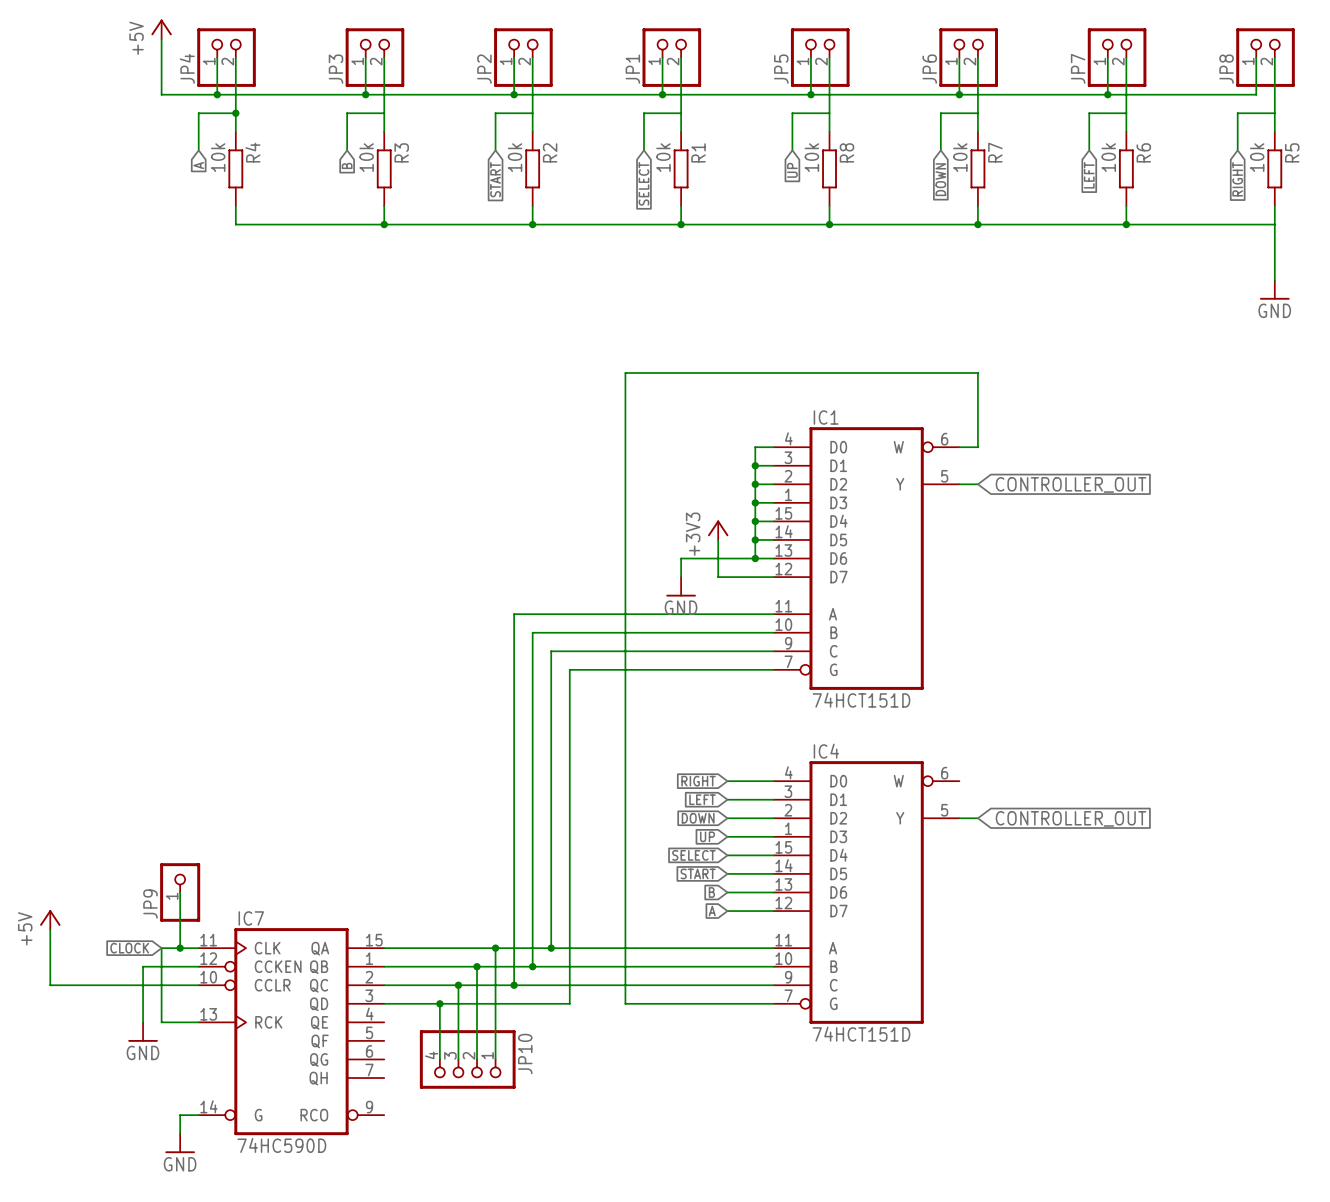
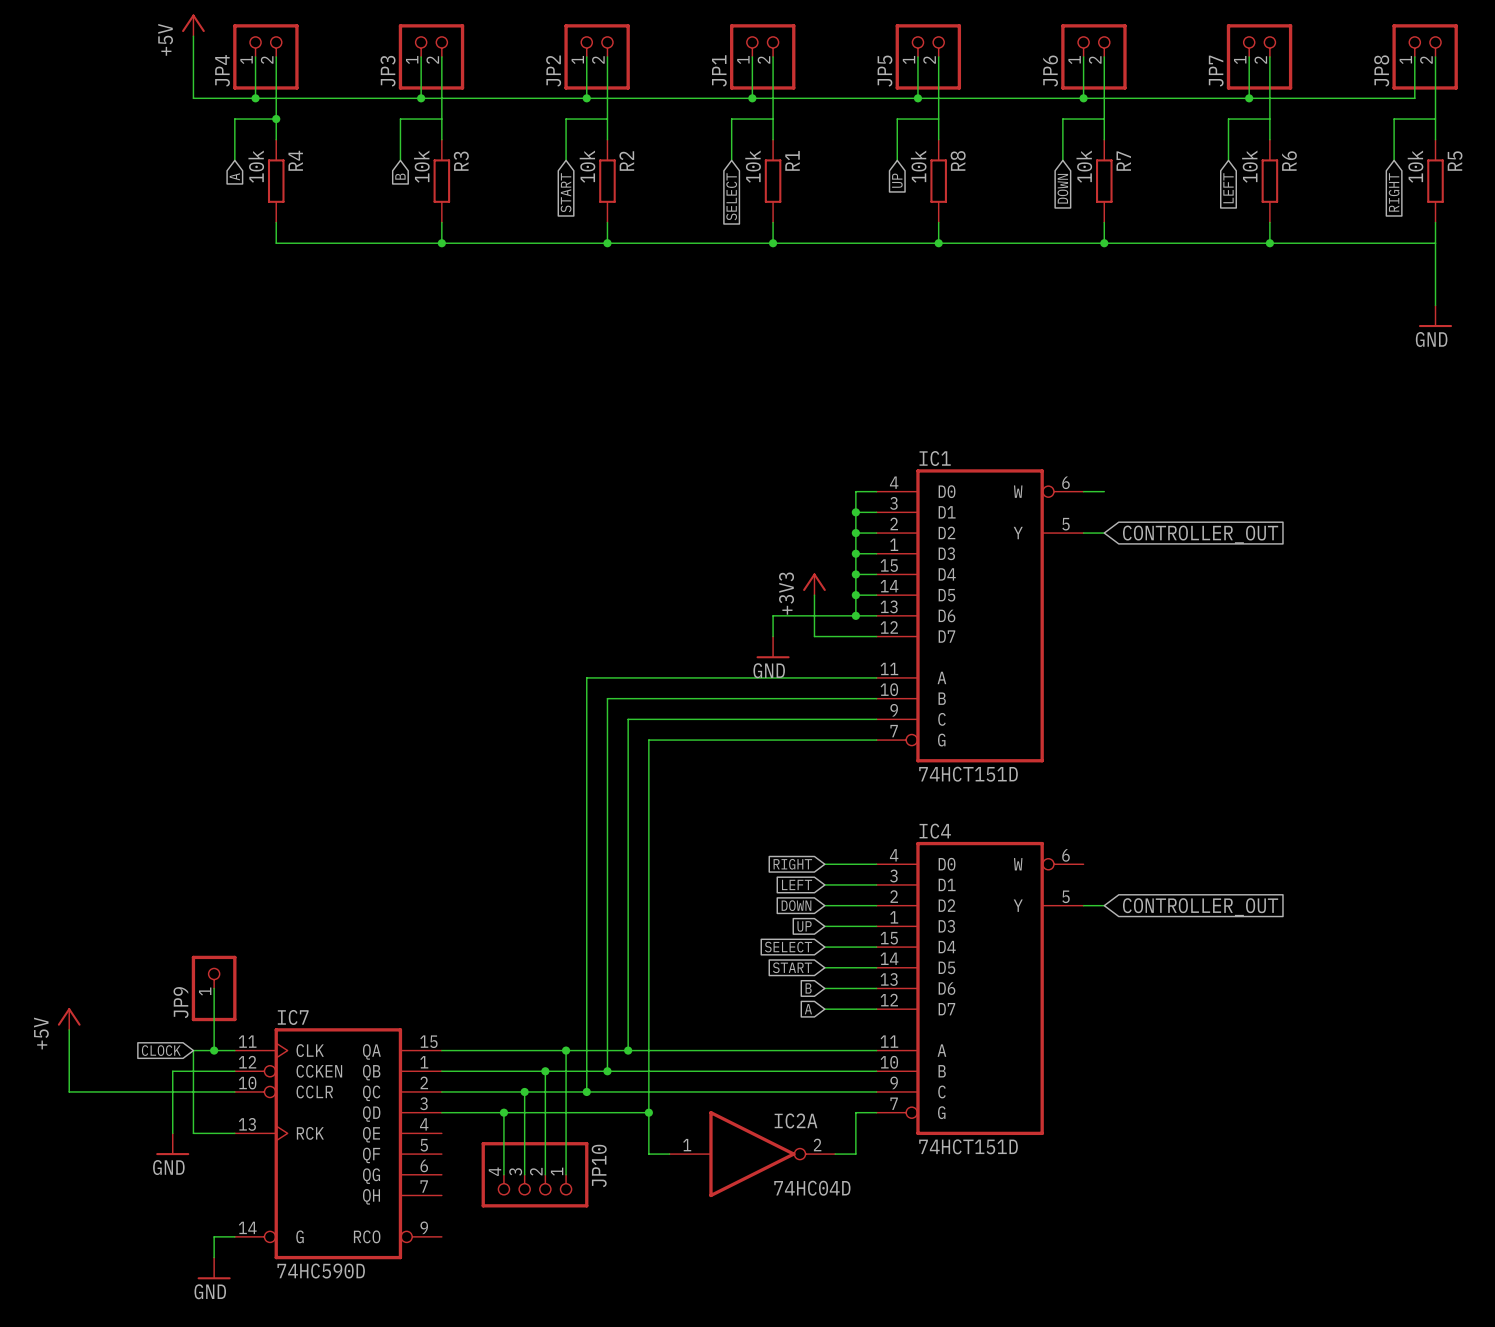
wire: (977, 447) (977, 372) (625, 372) (625, 1003) (755, 1003) -> (835, 1154) (855, 1154) (855, 1112)
wire: none -> (648, 1112) (648, 1154) (669, 1154)
junction: none -> (648, 1112)
IC2A: none -> 74HC04D (752, 1154)

